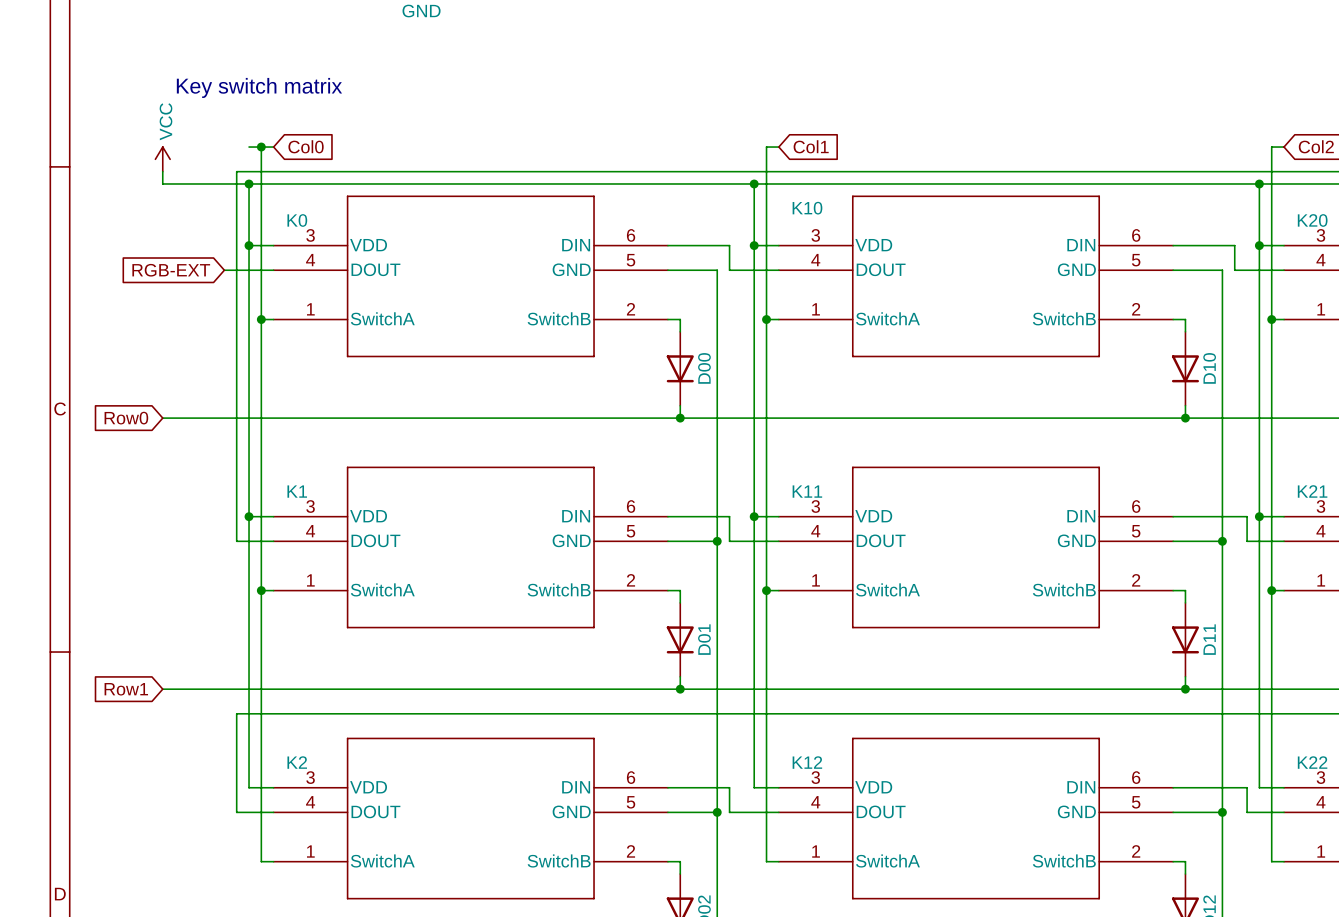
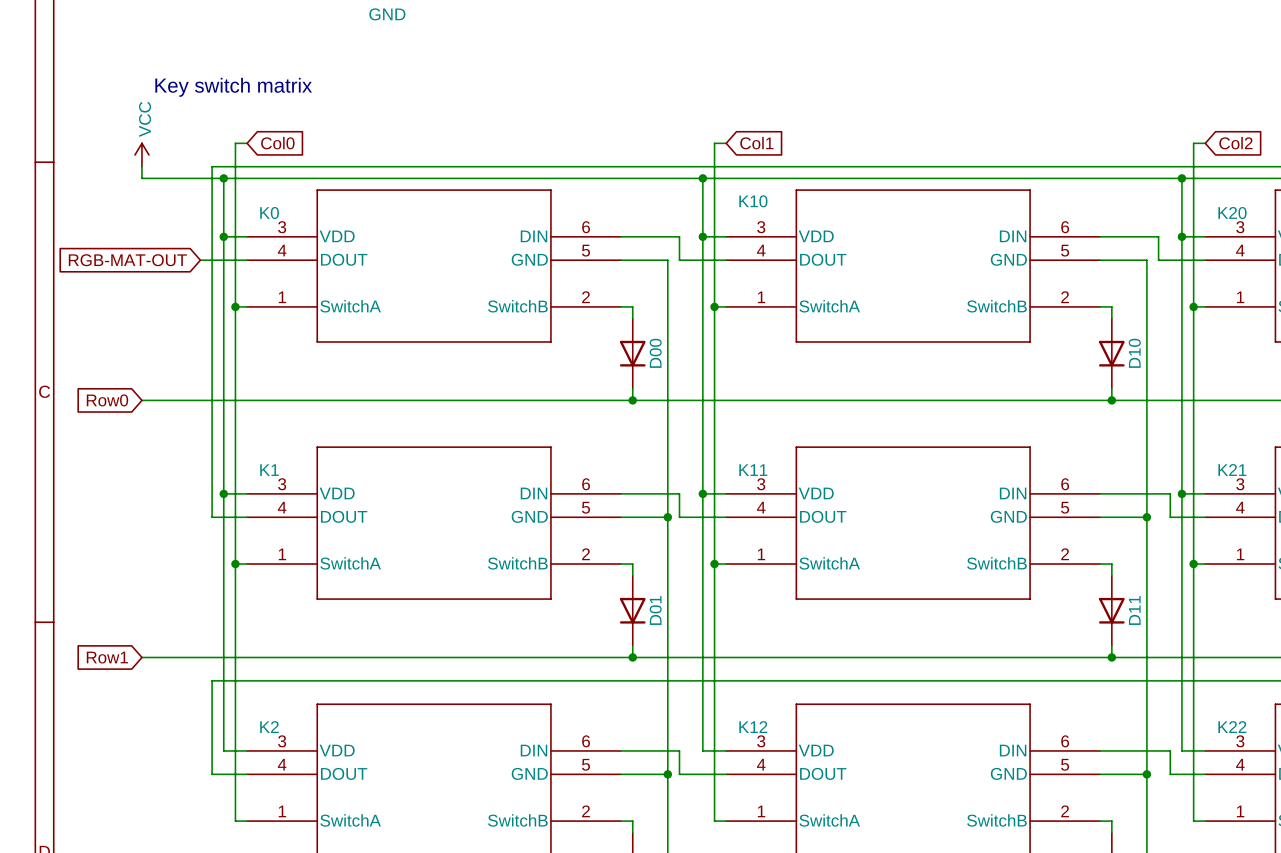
wire: (249, 147) (261, 147) -> none
junction: (261, 147) -> none
global label: RGB-EXT (171, 270) -> RGB-MAT-OUT (127, 260)

